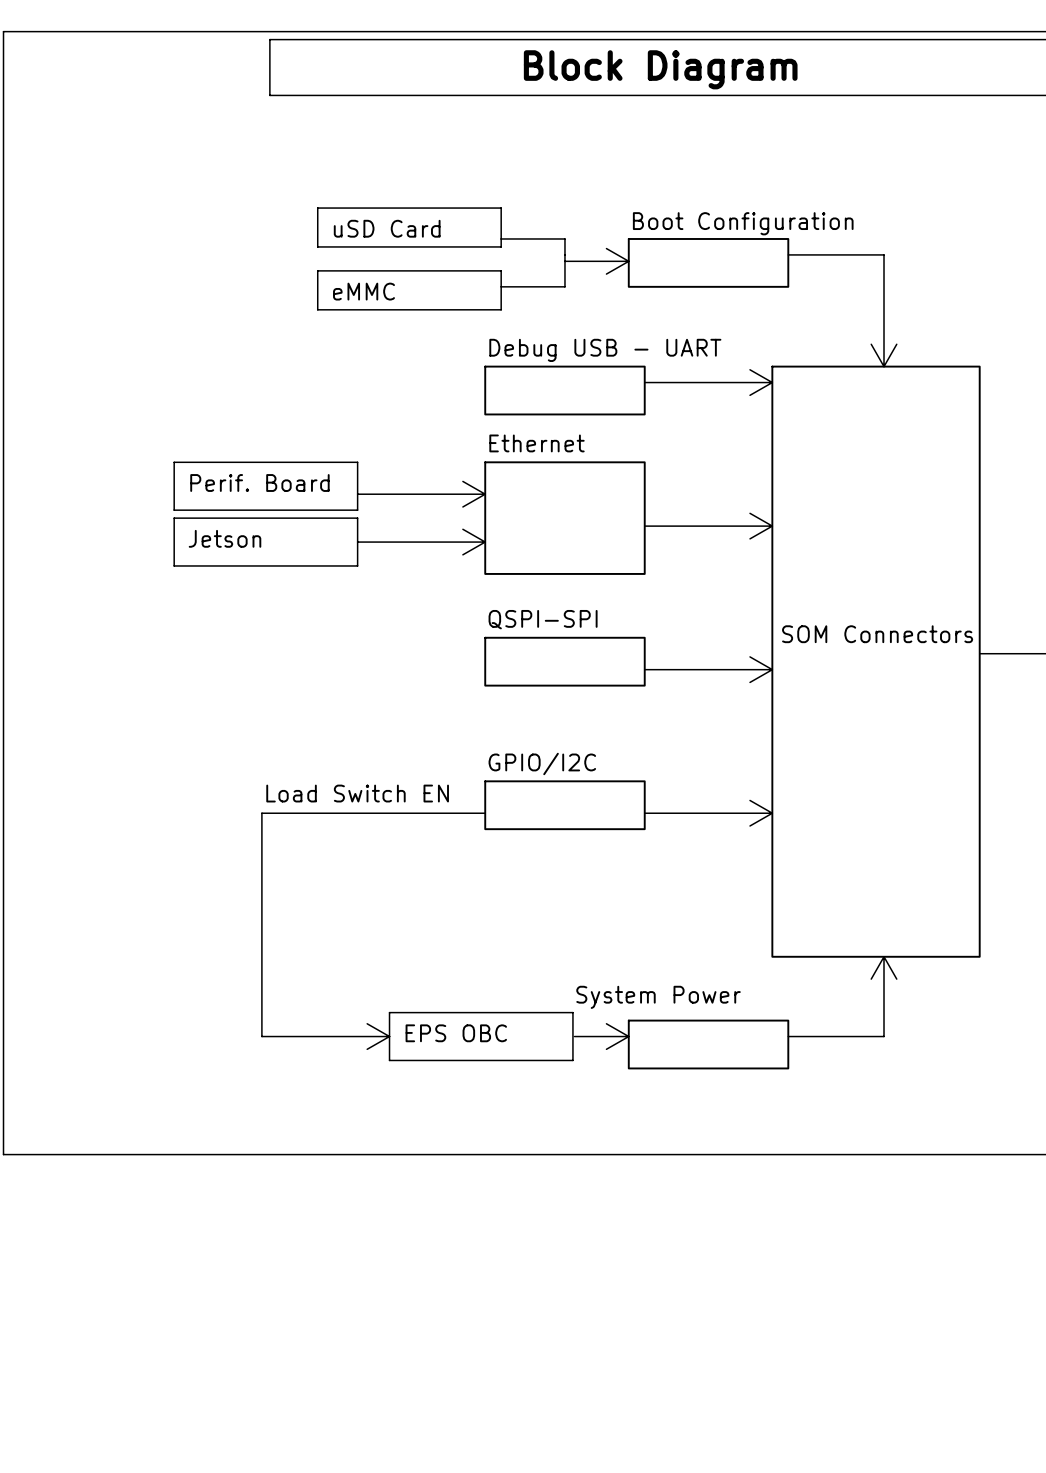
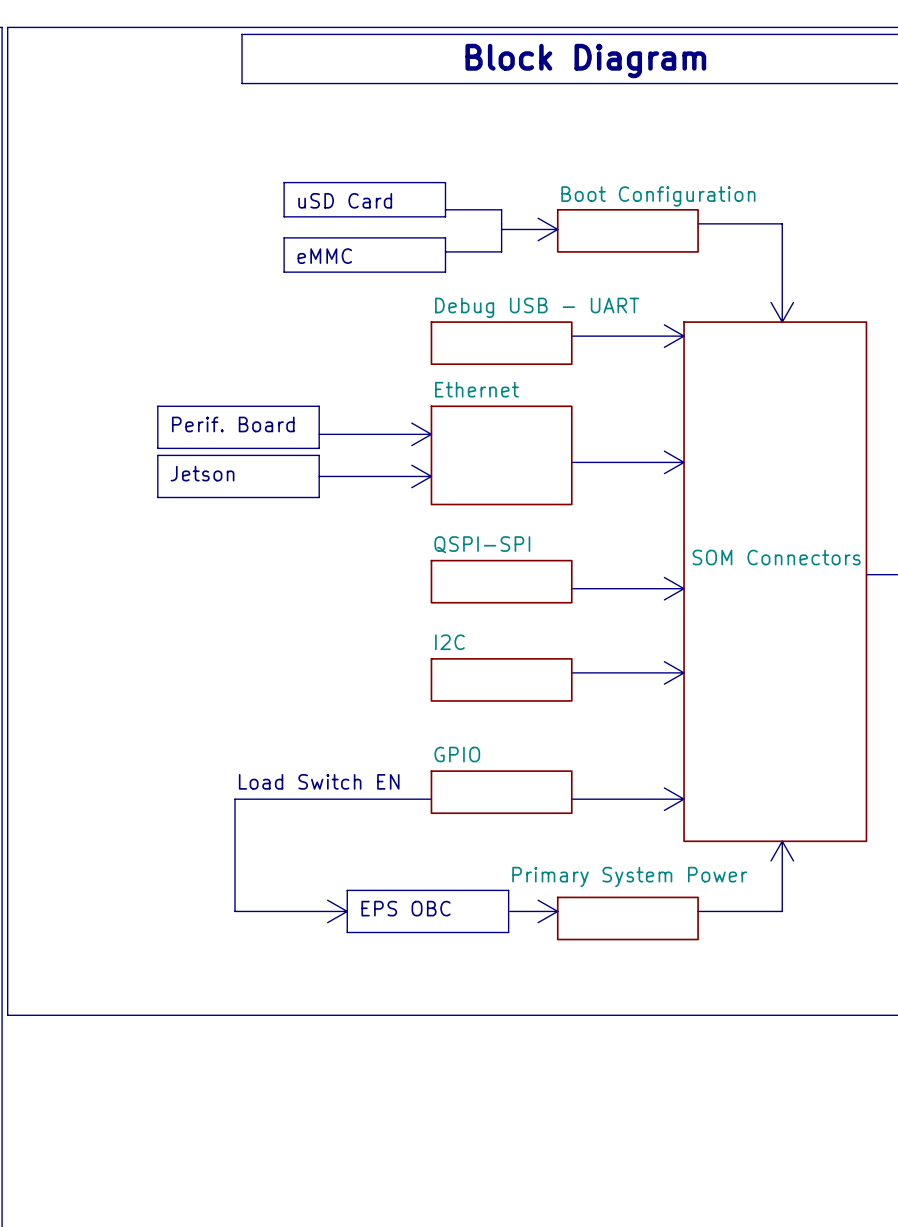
sheet I2C: none -> (501, 679)
text position: Load Switch EN (357, 793) -> Load Switch EN (319, 781)
line: (750, 800) (772, 813) -> (664, 661) (684, 672)
sheet GPIO/I2C: (564, 805) -> none
line: (485, 813) (261, 813) (261, 908) -> (431, 799) (235, 799)
line: (644, 813) (772, 813) -> (571, 672) (684, 672)
line: (772, 813) (750, 825) -> (684, 672) (664, 684)
line: none -> (664, 787) (684, 799)
sheet GPIO: none -> (501, 792)
line: none -> (571, 799) (684, 799)
line: none -> (684, 799) (664, 810)
sheet System Power name: System Power (658, 997) -> Primary System Power (629, 876)

